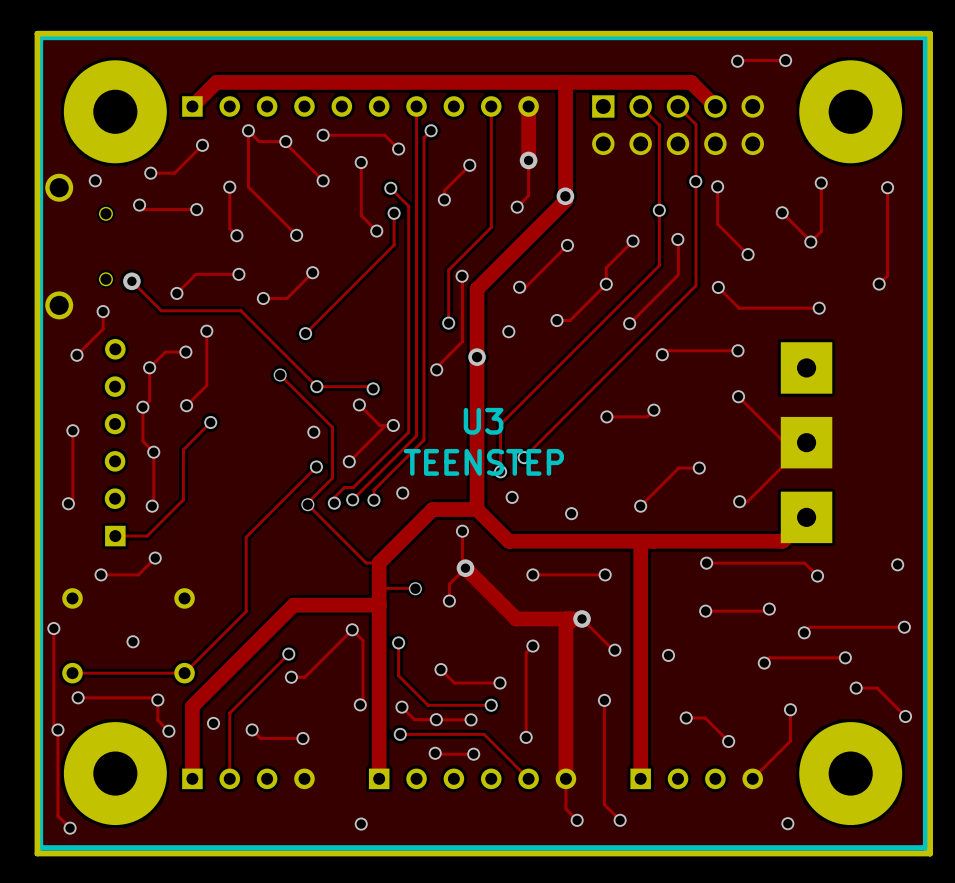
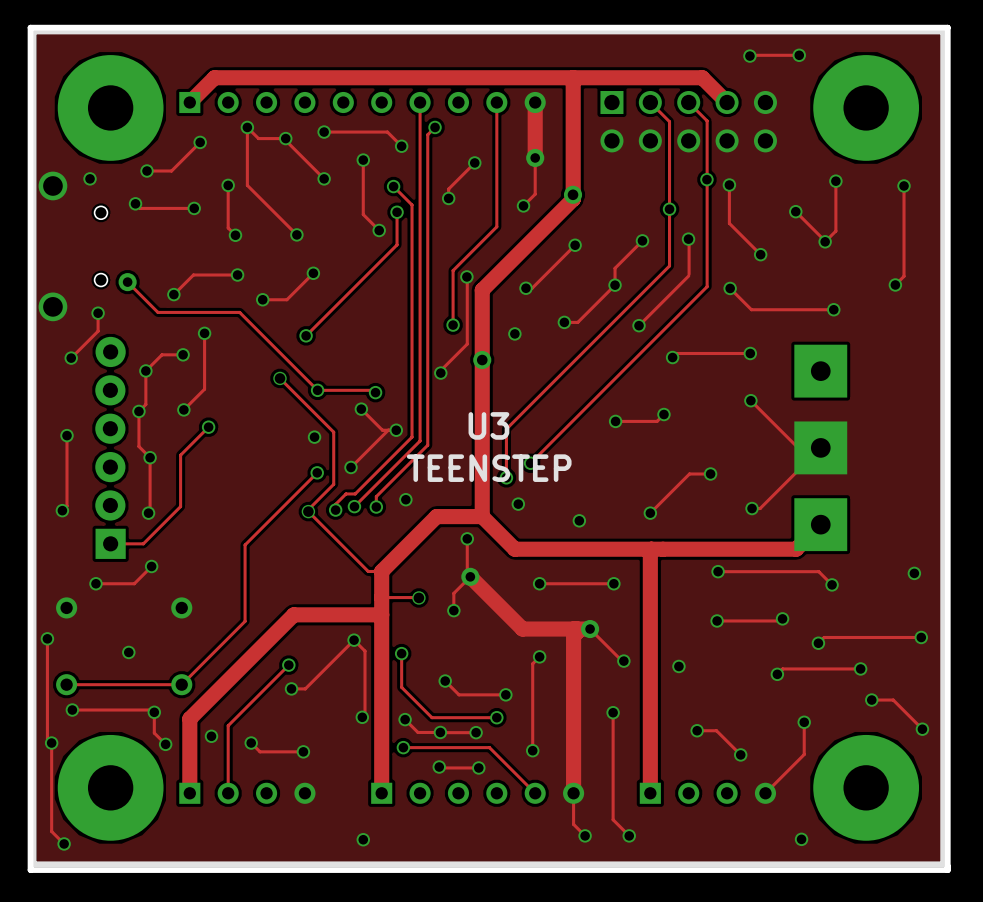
U3 footprint: [37, 34, 929, 851] -> [30, 28, 947, 868]

